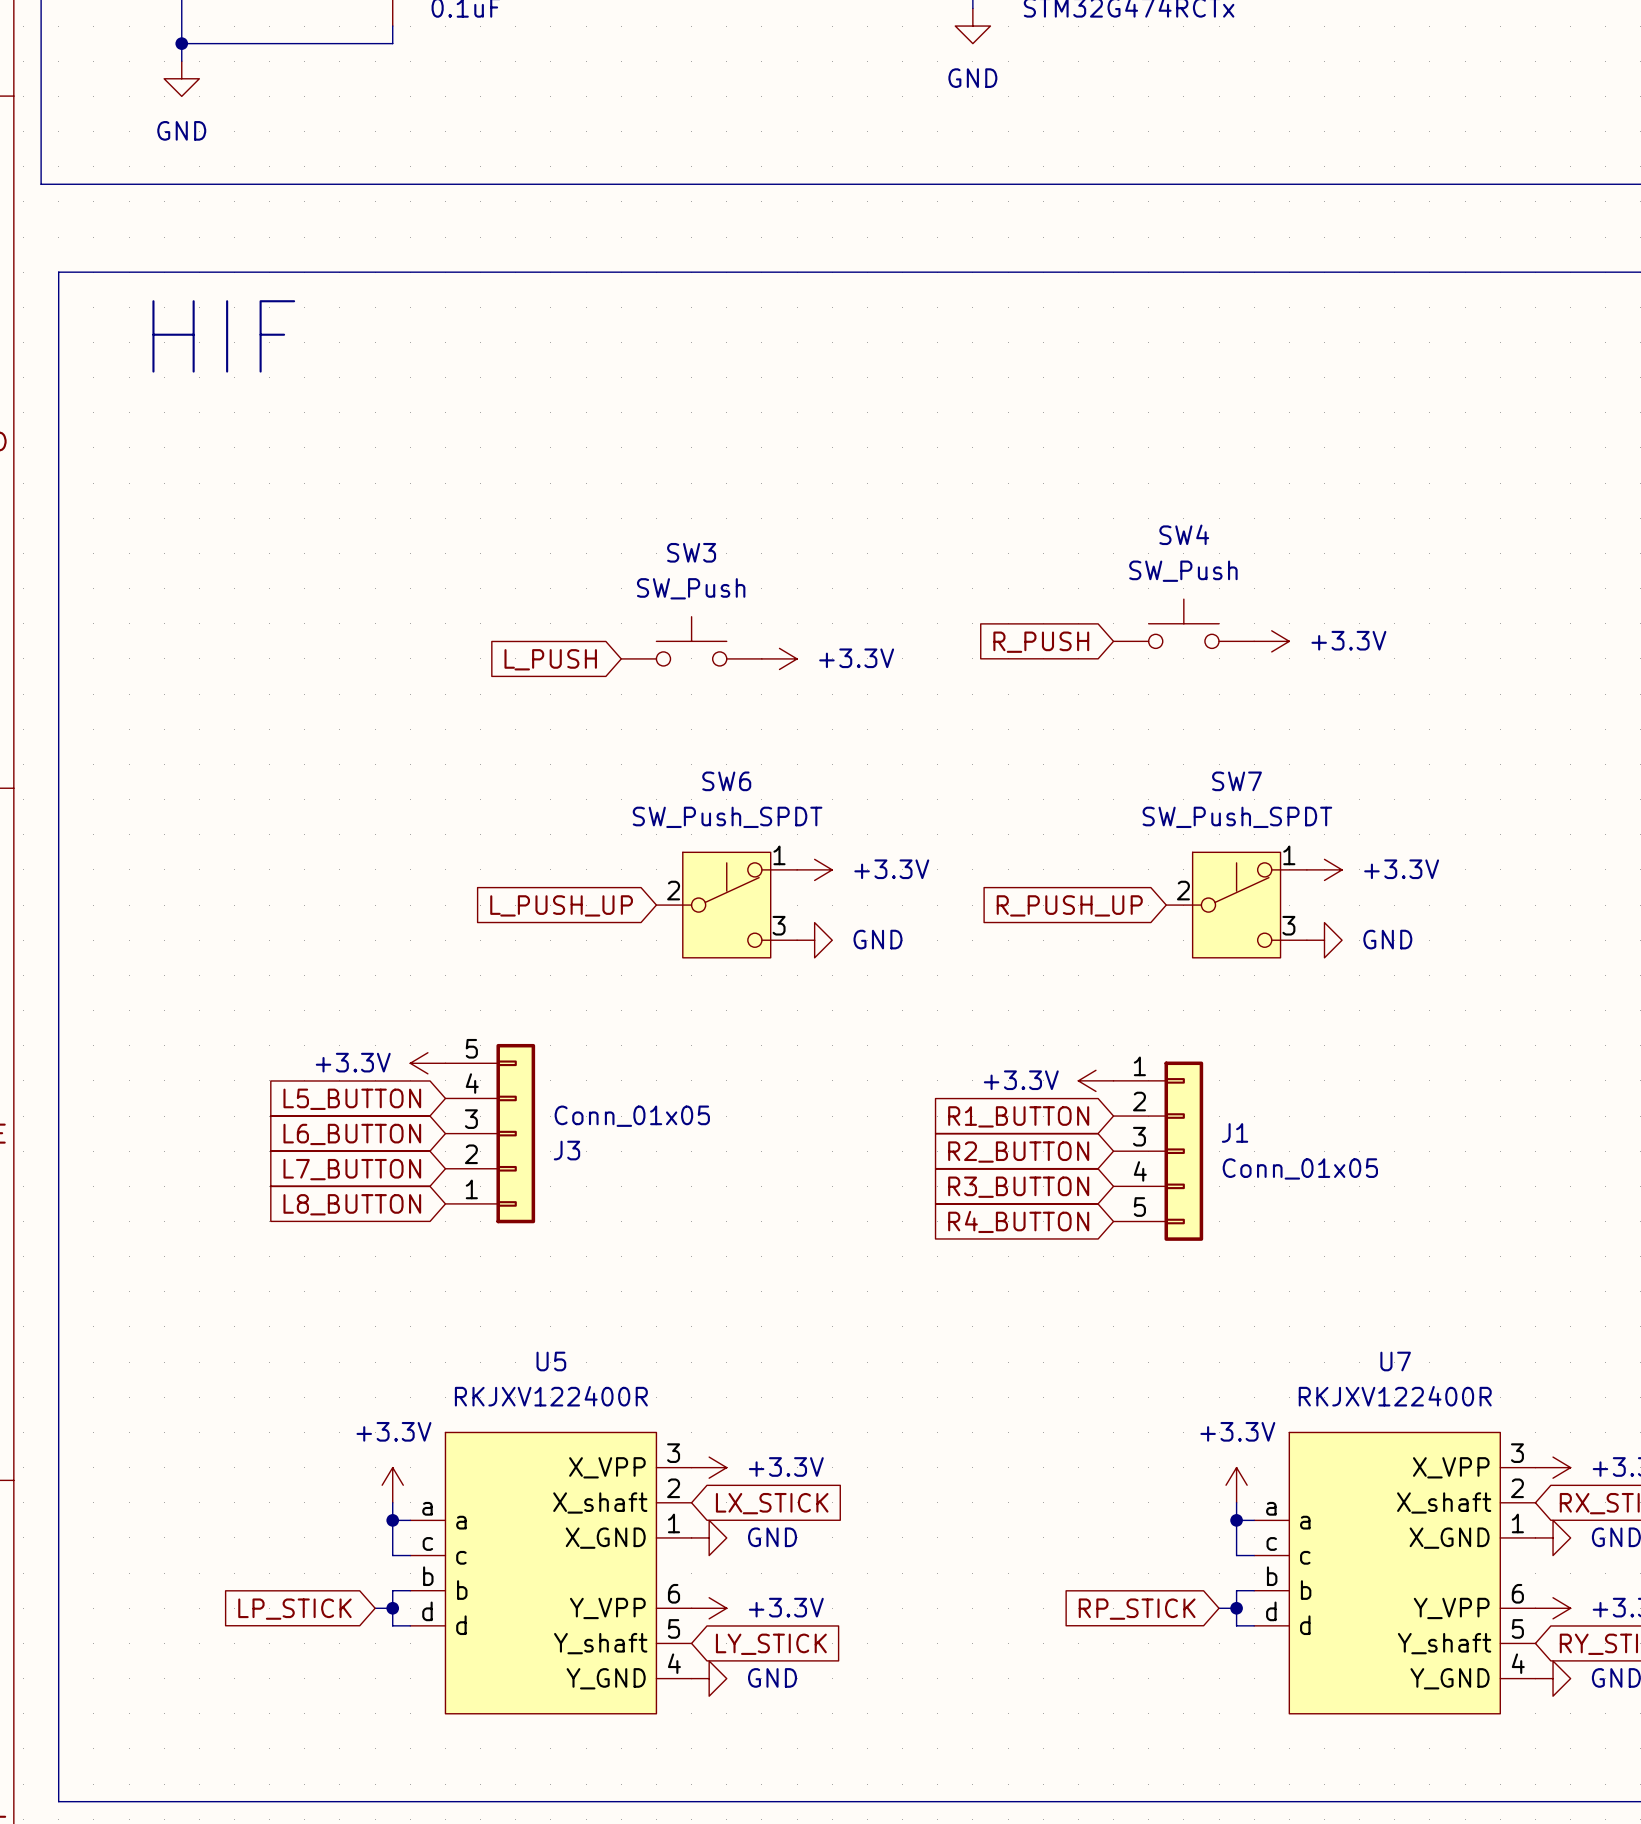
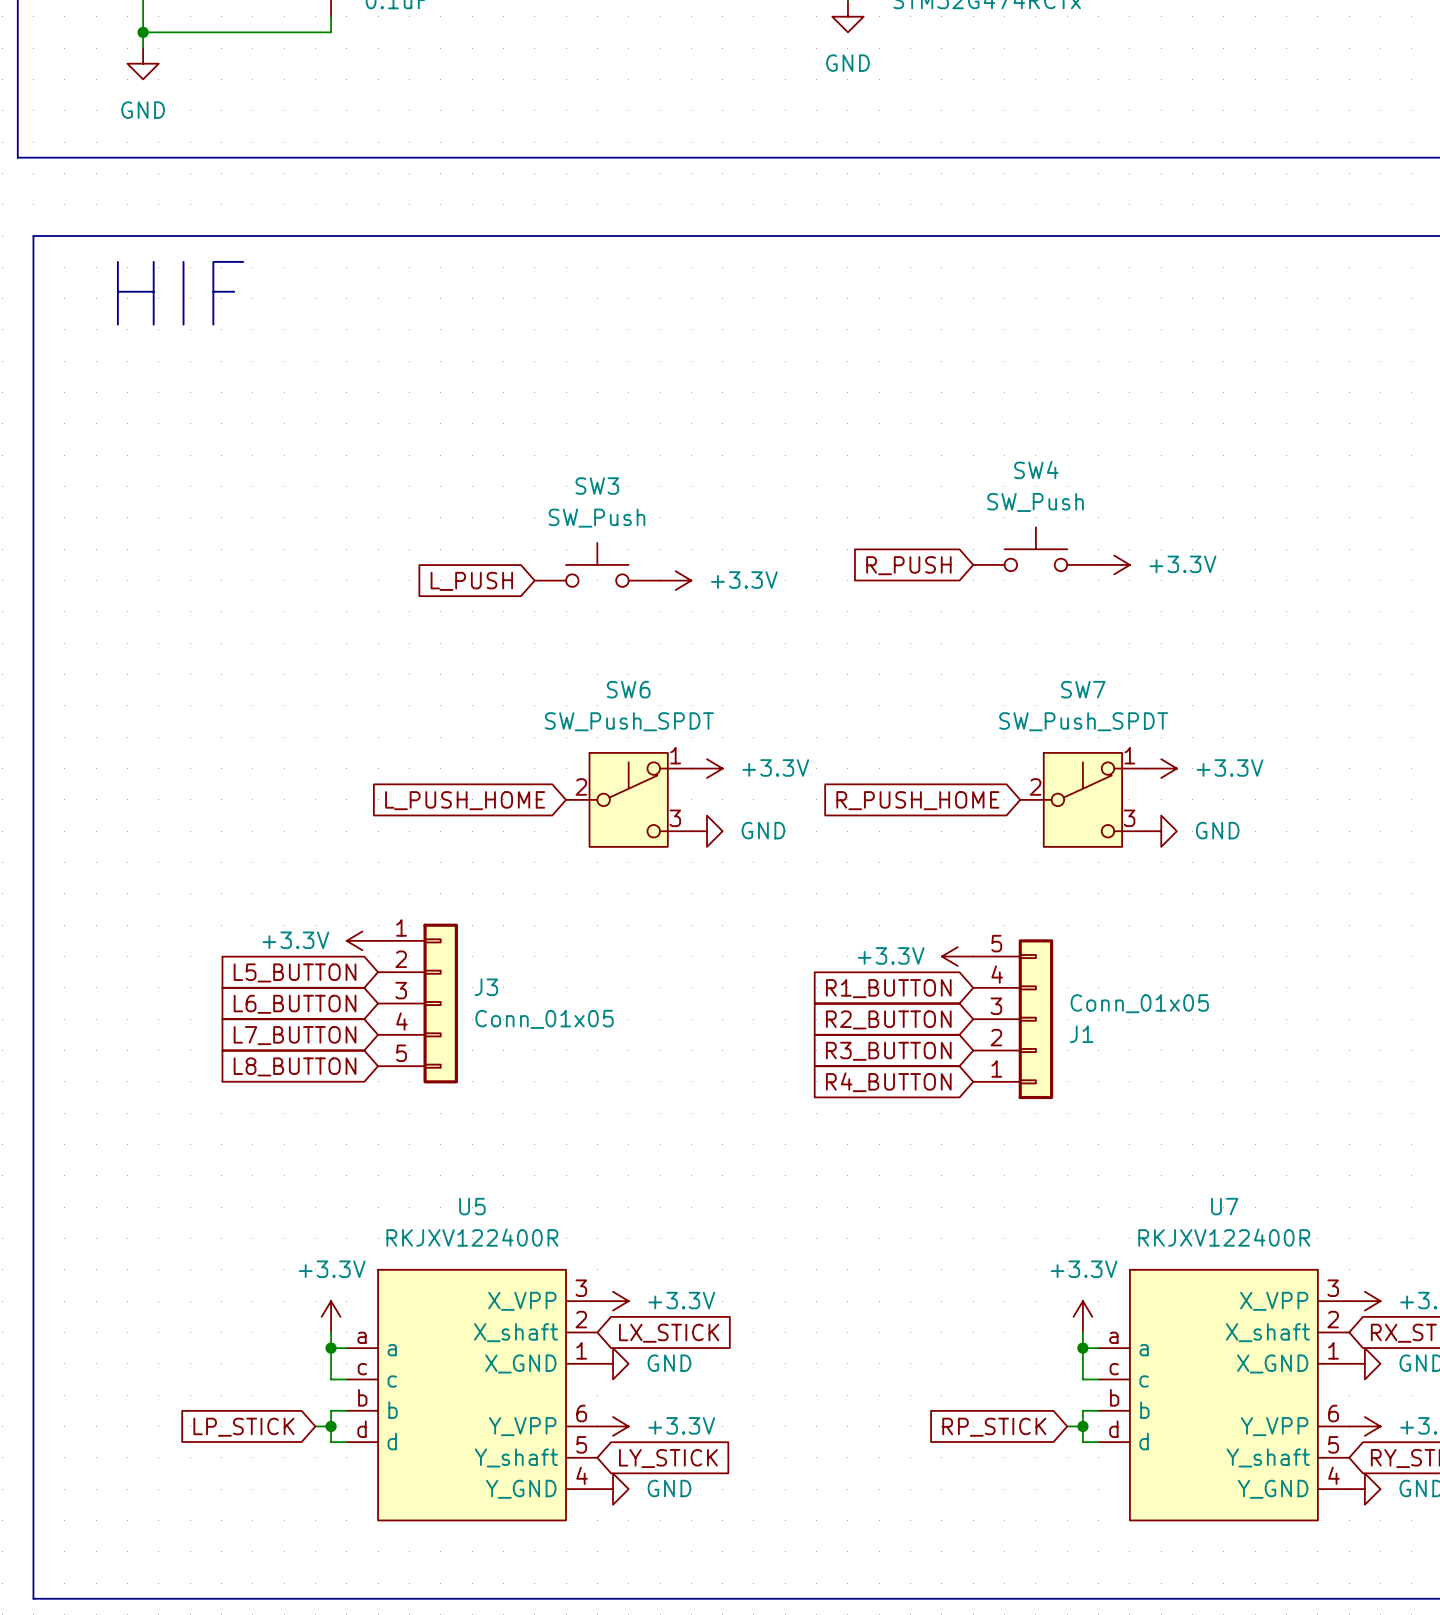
global label: L_PUSH_UP (561, 905) -> L_PUSH_HOME (465, 800)
global label: R_PUSH_UP (1069, 905) -> R_PUSH_HOME (917, 800)
J3 flip: as is (515, 1133) -> up-down (440, 1003)
J1 flip: as is (1183, 1151) -> up-down (1035, 1019)

